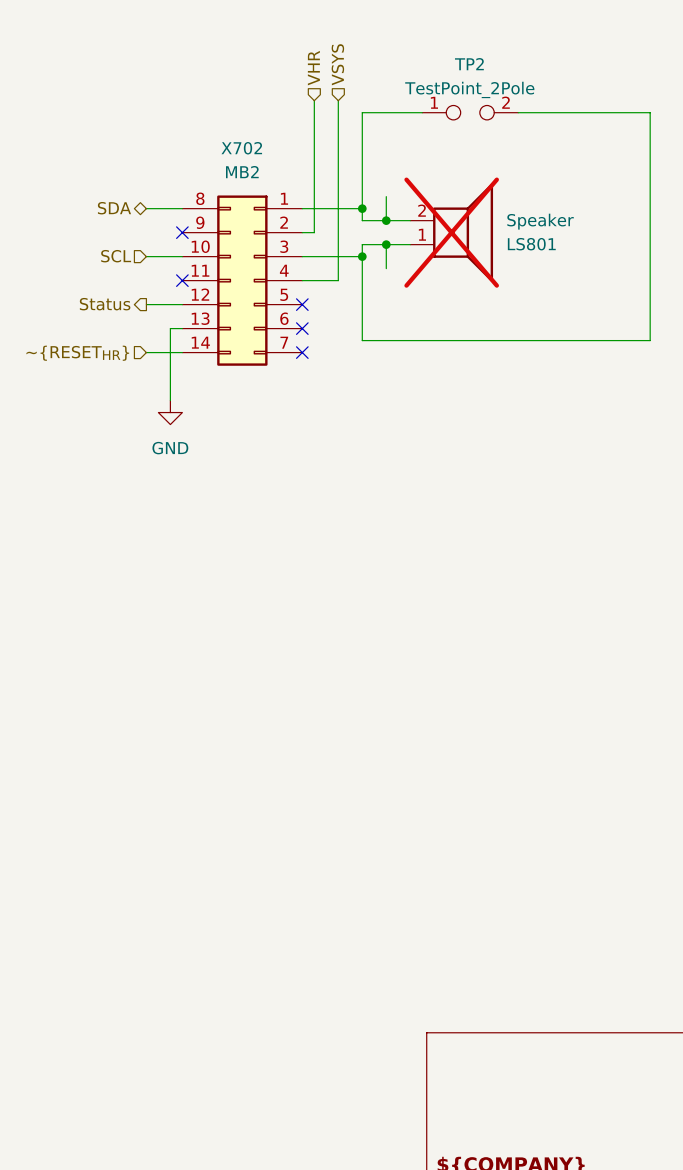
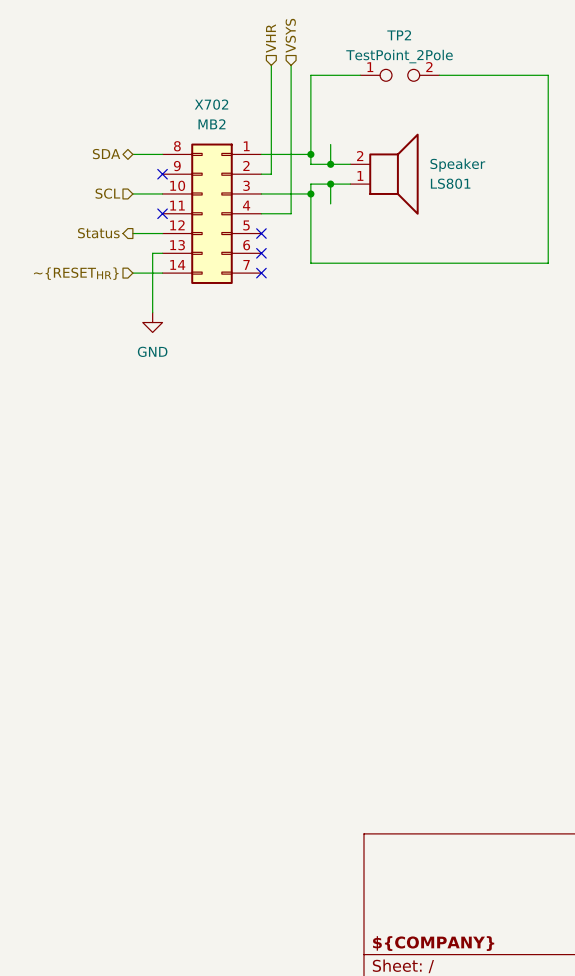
LS801 do-not-place cross: (451, 232) -> none

